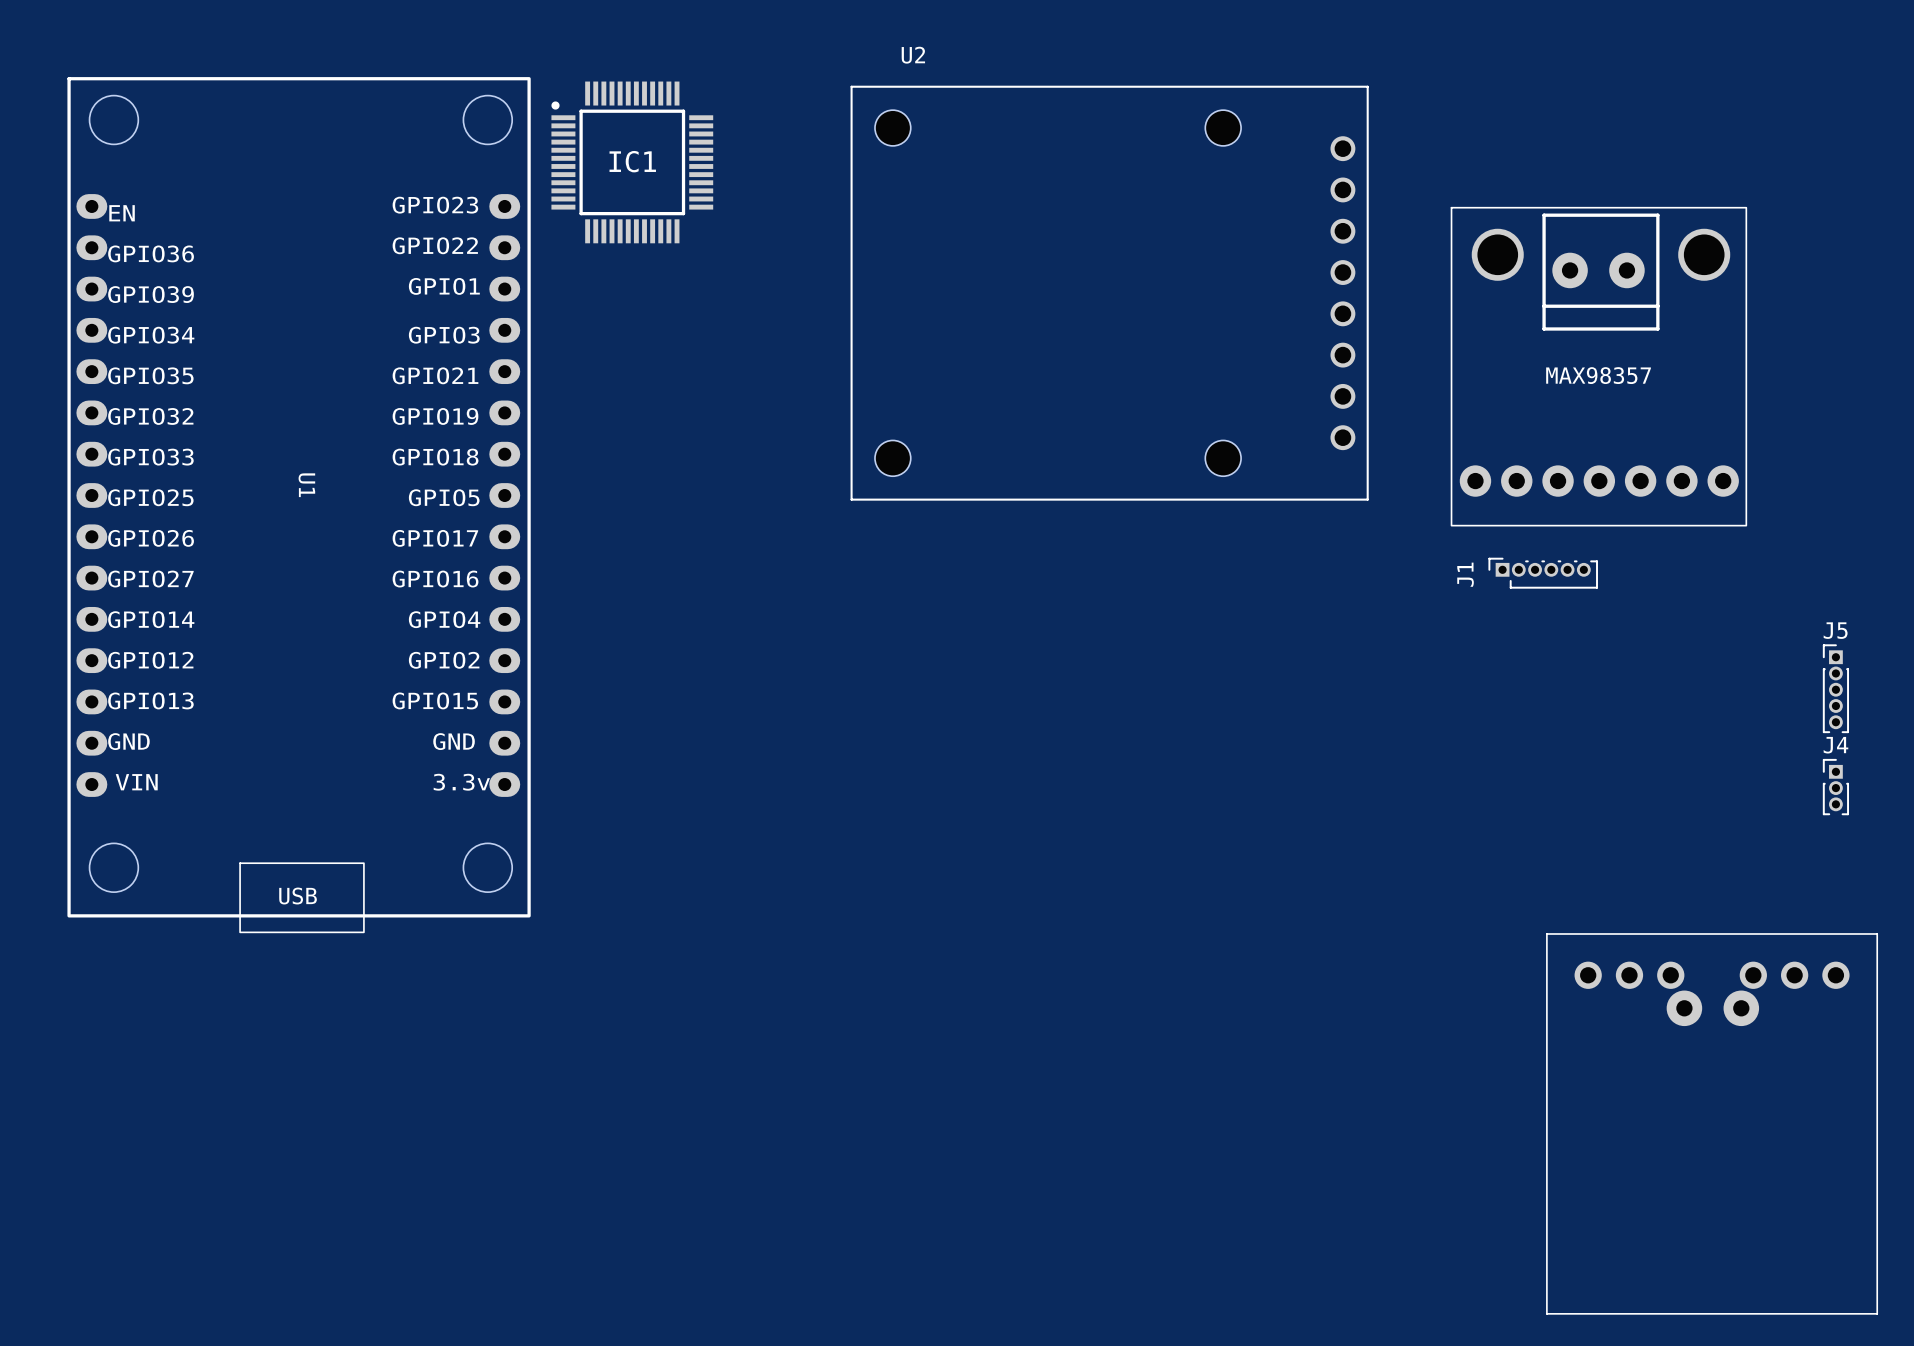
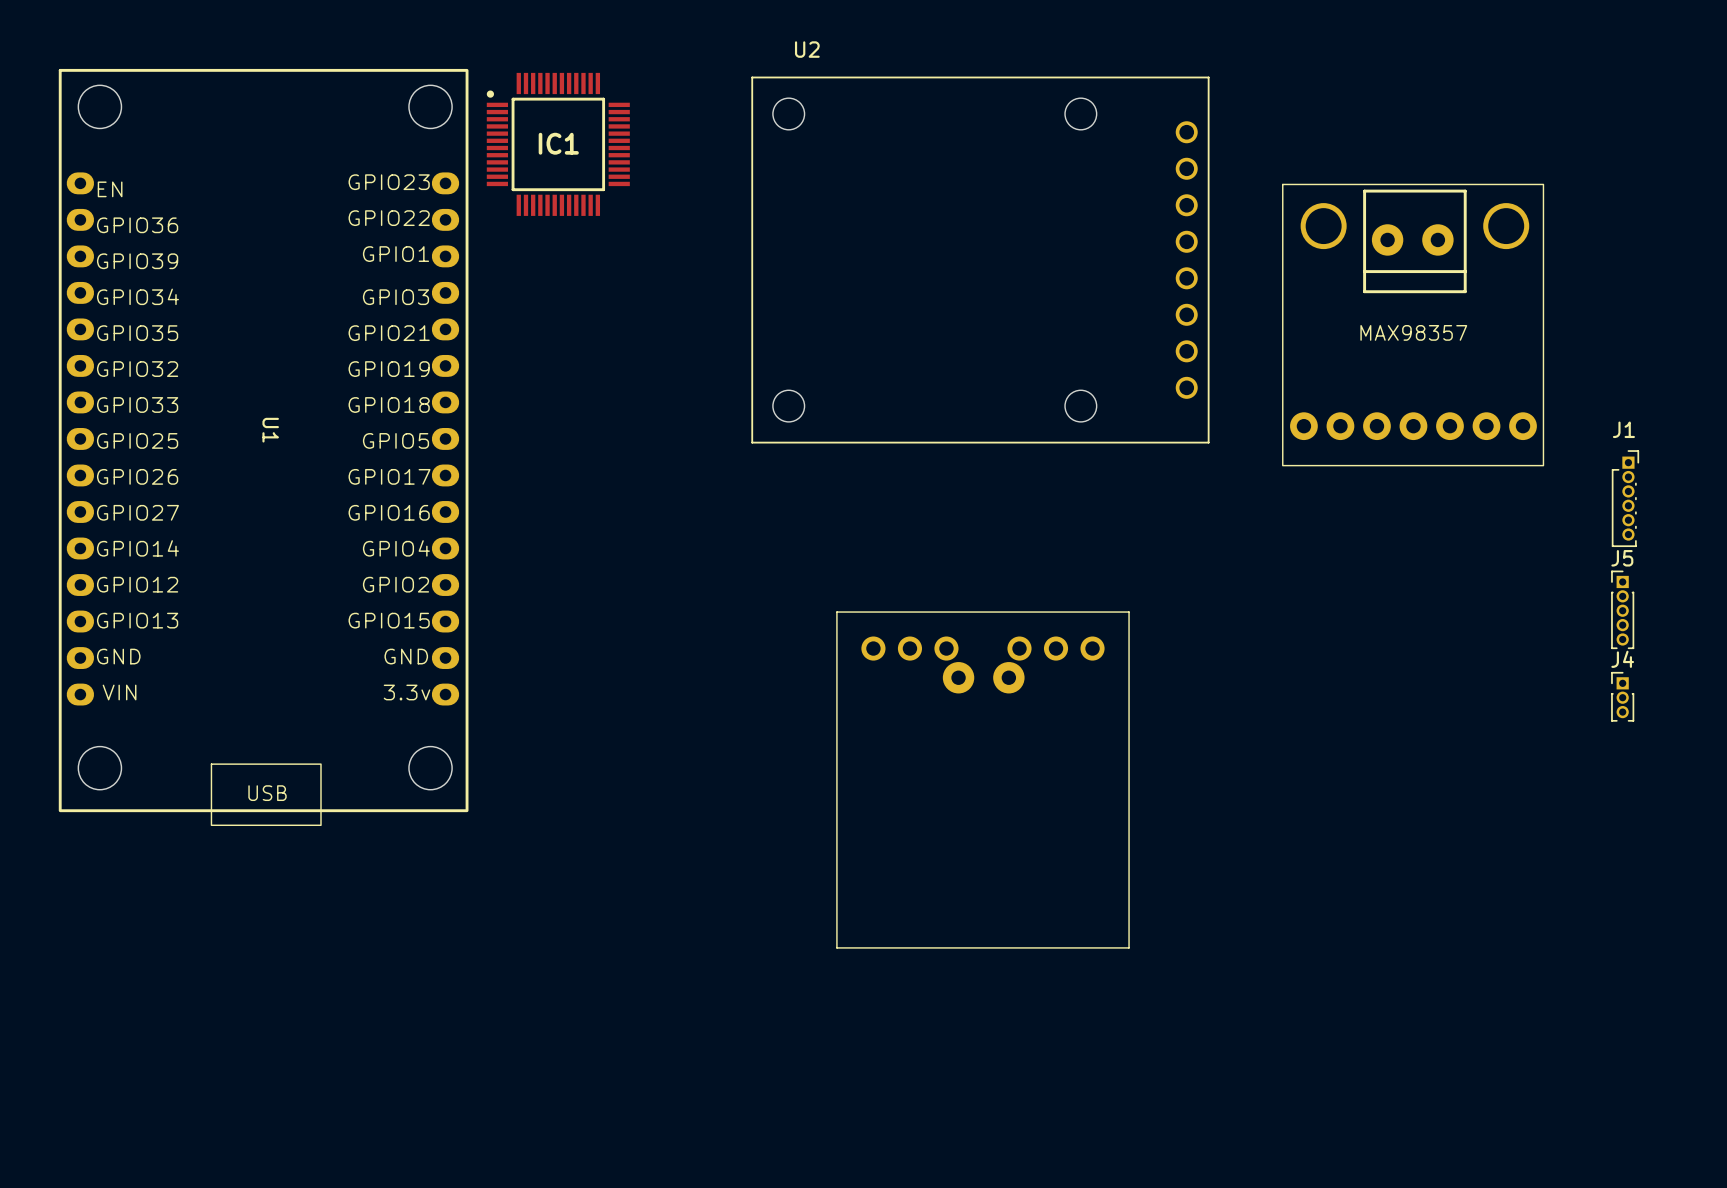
J1 rotation: 0° (1543, 573) -> 90° clockwise (1625, 498)
J1 position: (1543, 573) -> (1625, 498)
part: none -> (982, 779)
part: (1712, 1123) -> none

